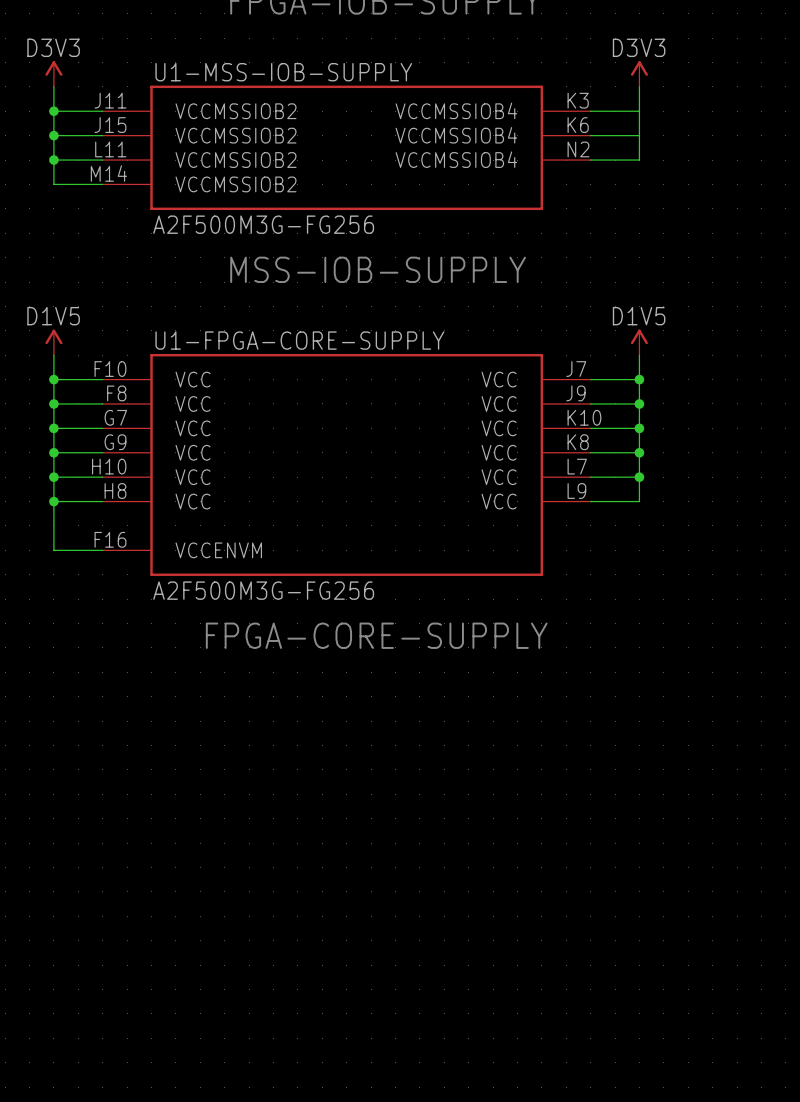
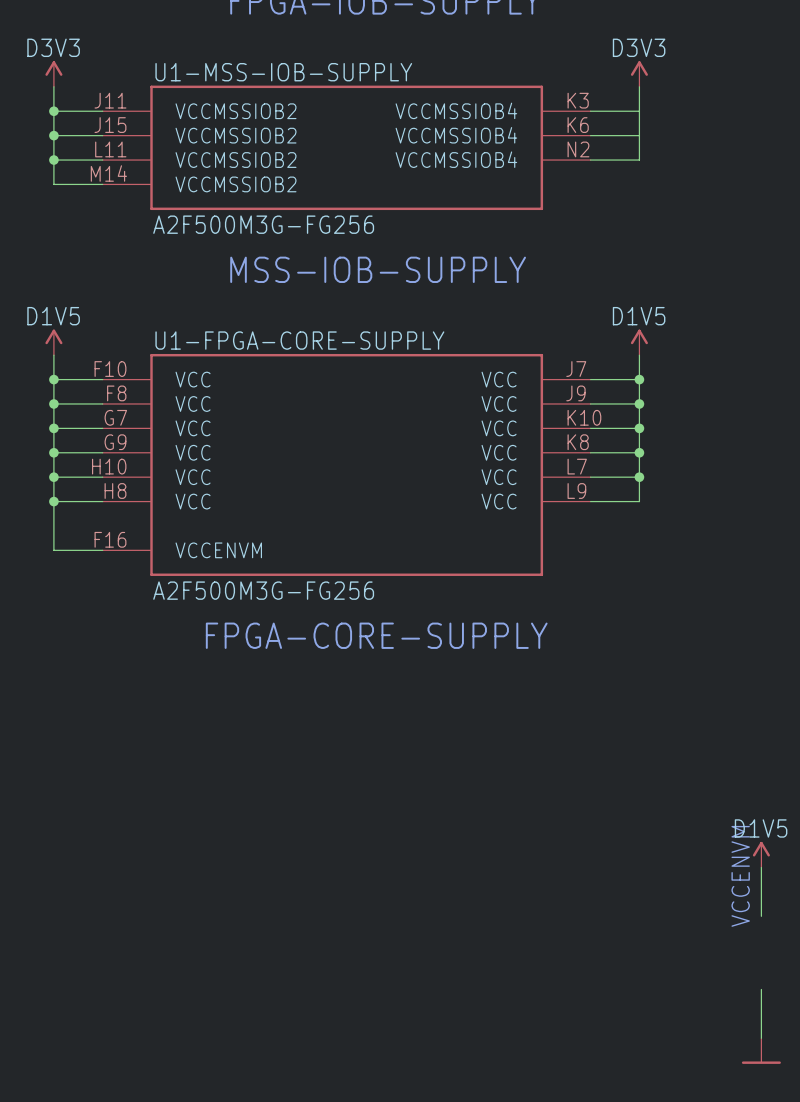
power symbol: none -> D1V5 (761, 854)
wire: none -> (761, 867) (761, 916)
text: none -> VCCENVM (740, 876)
wire: none -> (761, 989) (761, 1038)
power symbol: none -> (761, 1051)

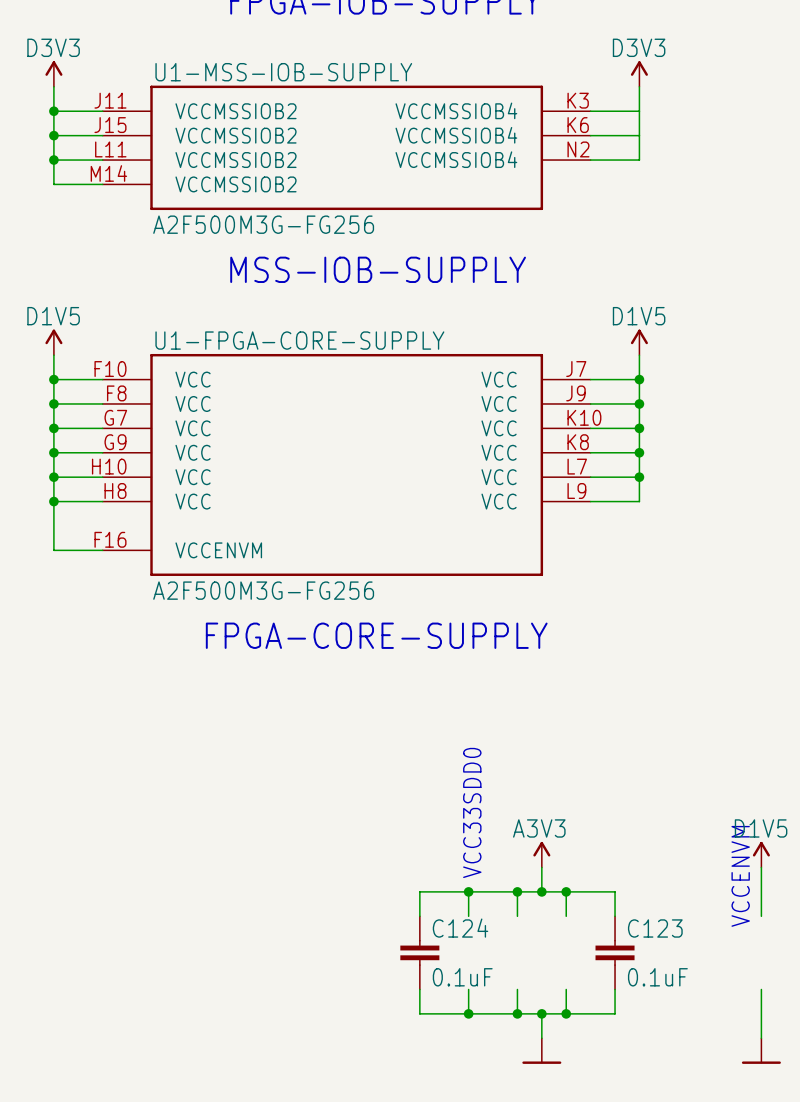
text: none -> VCC33SDD0 (472, 812)
power symbol: none -> A3V3 (541, 854)
wire: none -> (541, 867) (541, 891)
wire: none -> (468, 891) (468, 916)
junction: none -> (468, 891)
wire: none -> (517, 891) (517, 916)
junction: none -> (517, 891)
junction: none -> (541, 891)
wire: none -> (566, 891) (566, 916)
junction: none -> (566, 891)
wire: none -> (419, 916) (419, 891) (615, 891) (615, 916)
C124: none -> 0.1uF (419, 952)
C123: none -> 0.1uF (615, 952)
wire: none -> (419, 989) (419, 1013) (615, 1013) (615, 989)
wire: none -> (468, 989) (468, 1013)
wire: none -> (517, 989) (517, 1013)
wire: none -> (566, 989) (566, 1013)
junction: none -> (468, 1013)
junction: none -> (517, 1013)
wire: none -> (541, 1013) (541, 1038)
junction: none -> (541, 1013)
junction: none -> (566, 1013)
power symbol: none -> (541, 1051)

